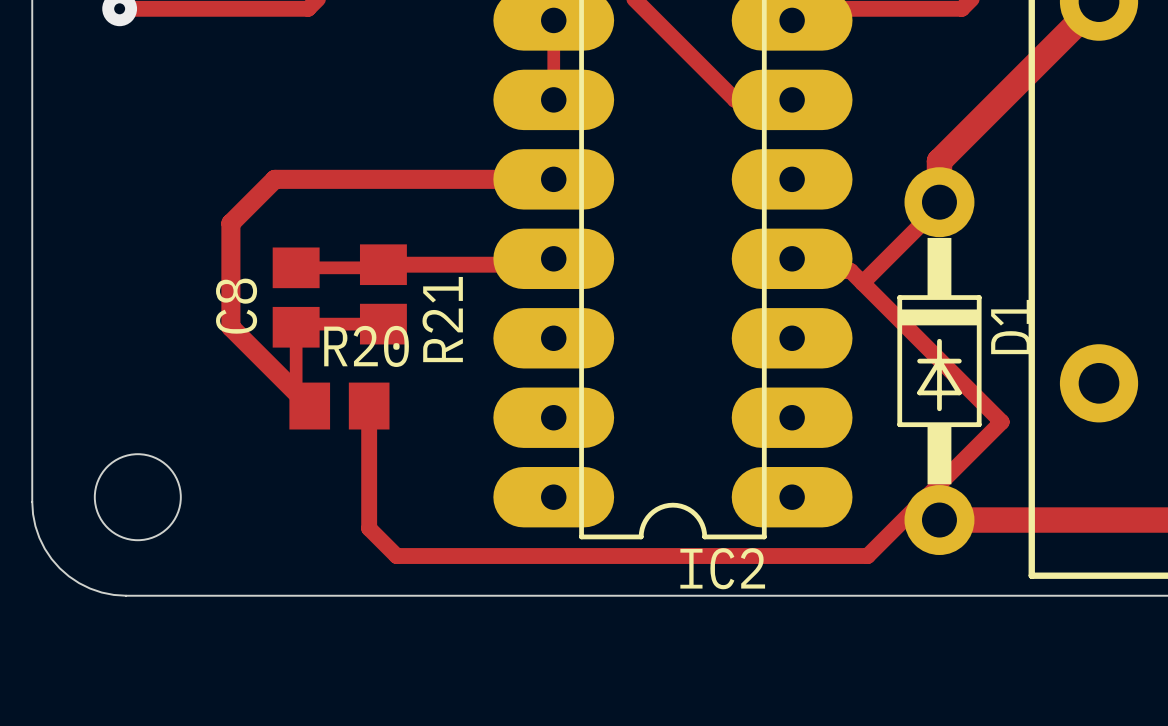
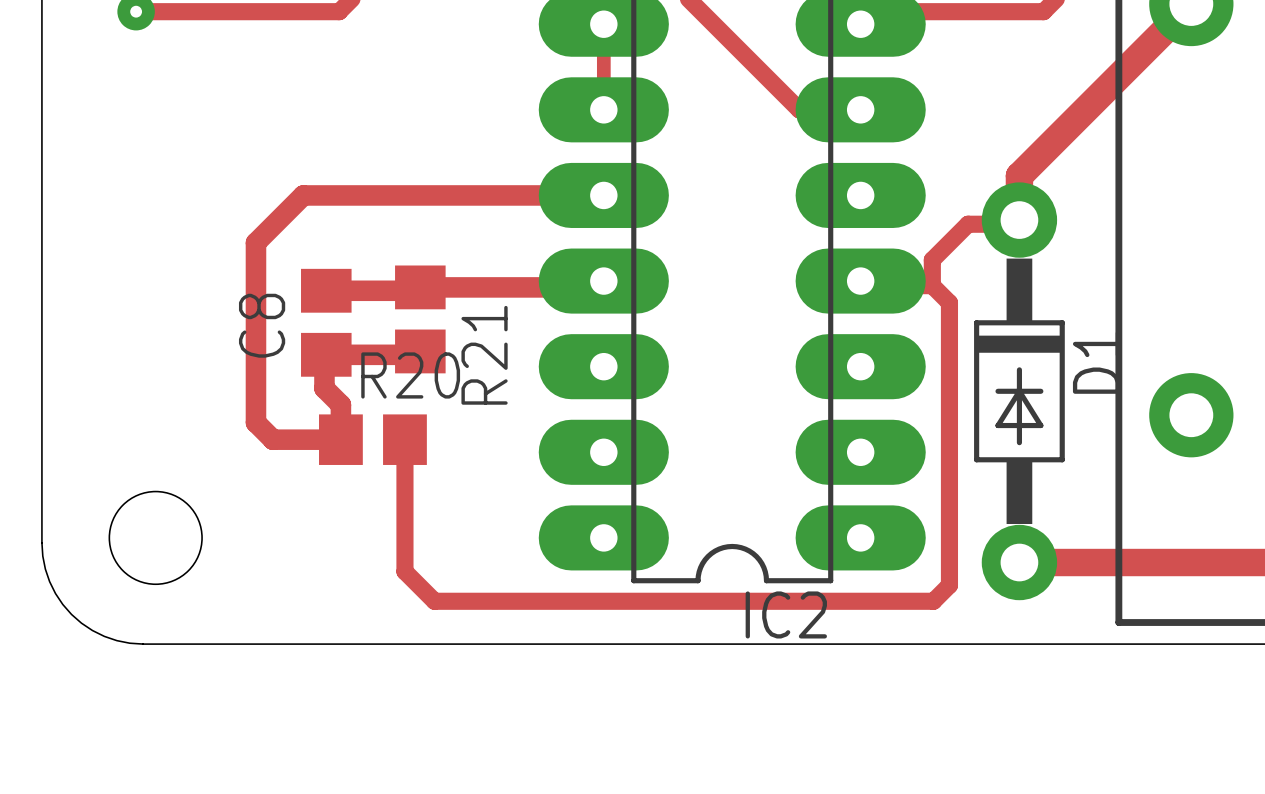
track: (939, 206) (862, 282) -> (1019, 224) (968, 224) (932, 259) (932, 285)
track width: thin (547, 264) (383, 264) (380, 267) (296, 267) -> thick (597, 287) (420, 287) (416, 290) (326, 290)
track: (804, 271) (850, 271) (1001, 421) (867, 556) (859, 556) -> (932, 285) (949, 302) (949, 585) (933, 601)
track: (383, 324) (299, 324) (296, 327) (296, 392) (309, 406) (230, 327) -> (420, 351) (416, 354) (326, 354) (324, 356) (324, 388) (340, 404) (340, 439) (273, 439) (255, 422) (255, 354)

